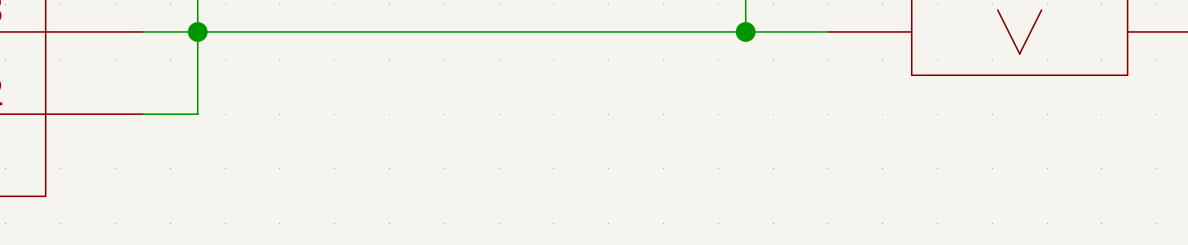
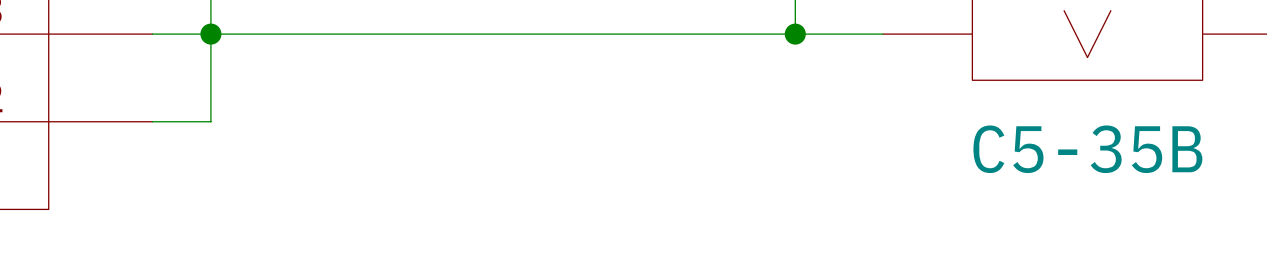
part text: none -> C5-35В (1087, 149)

